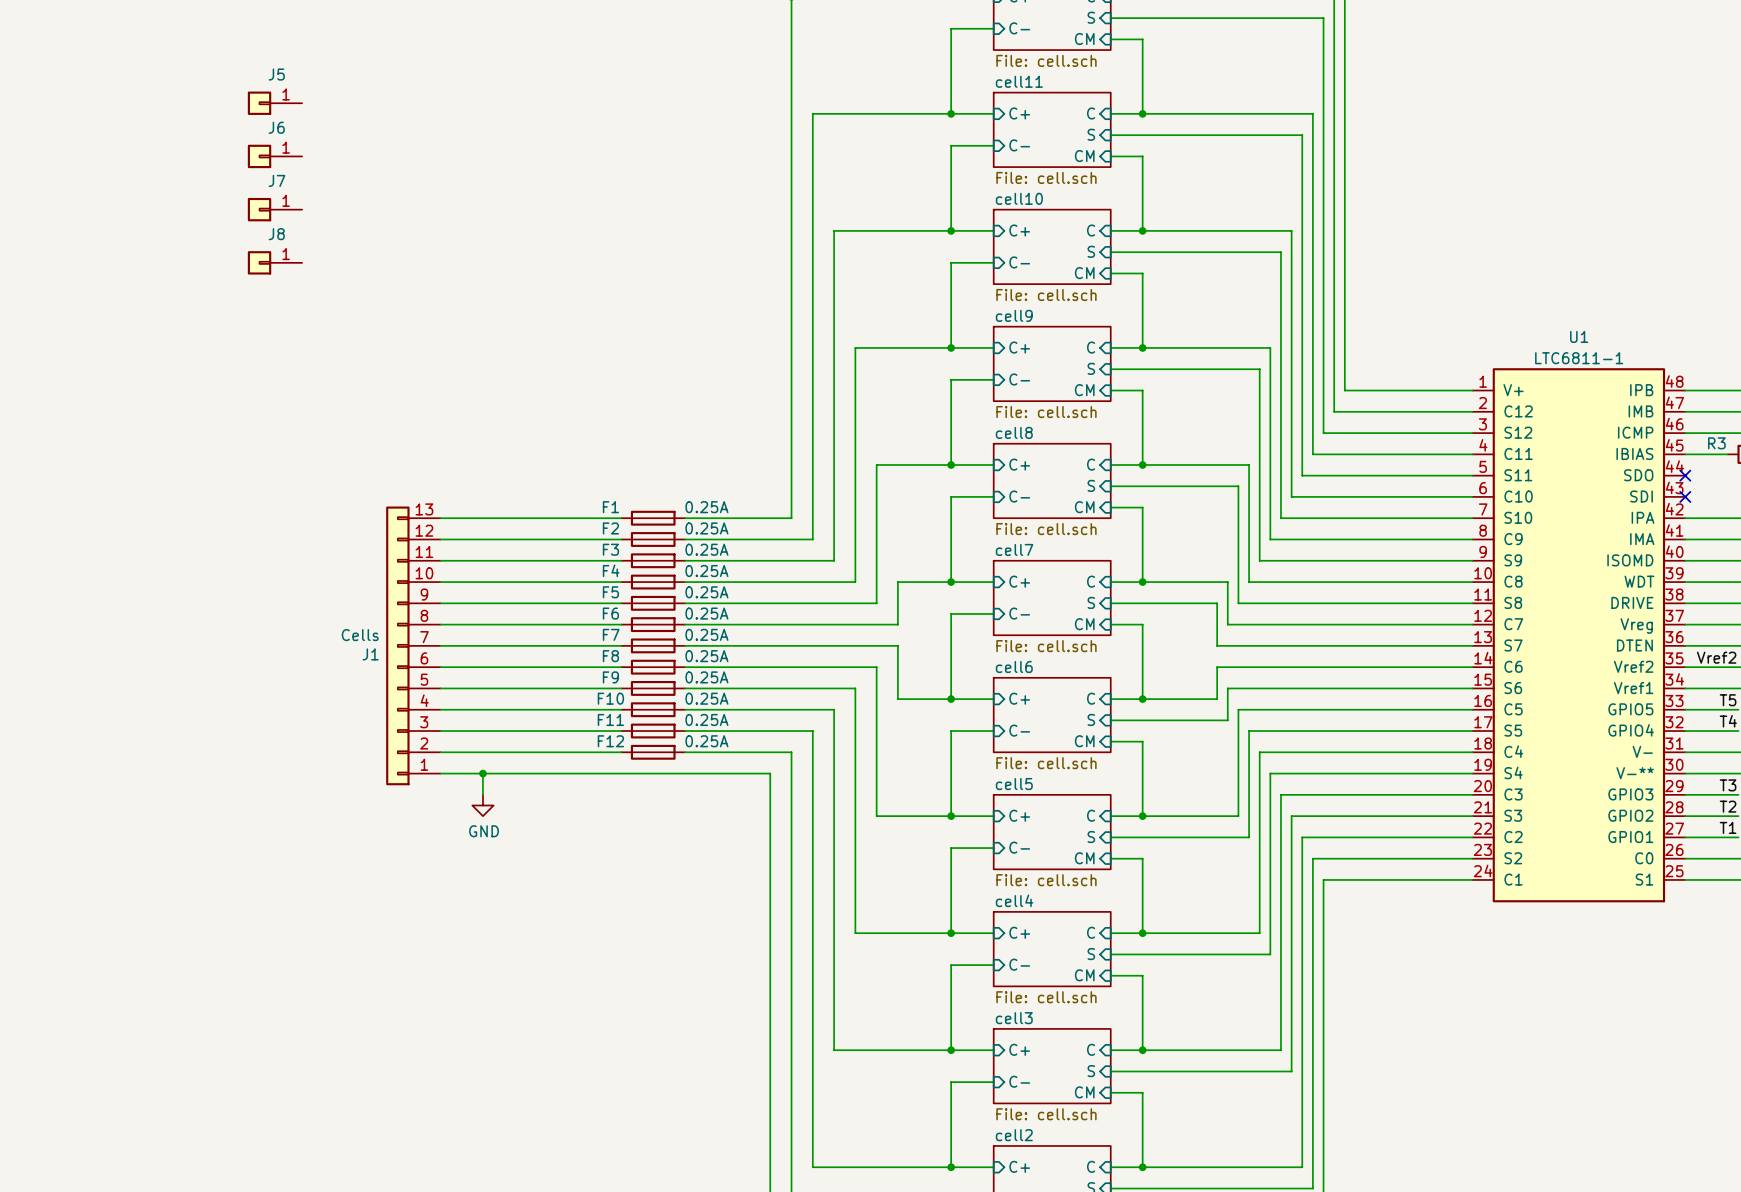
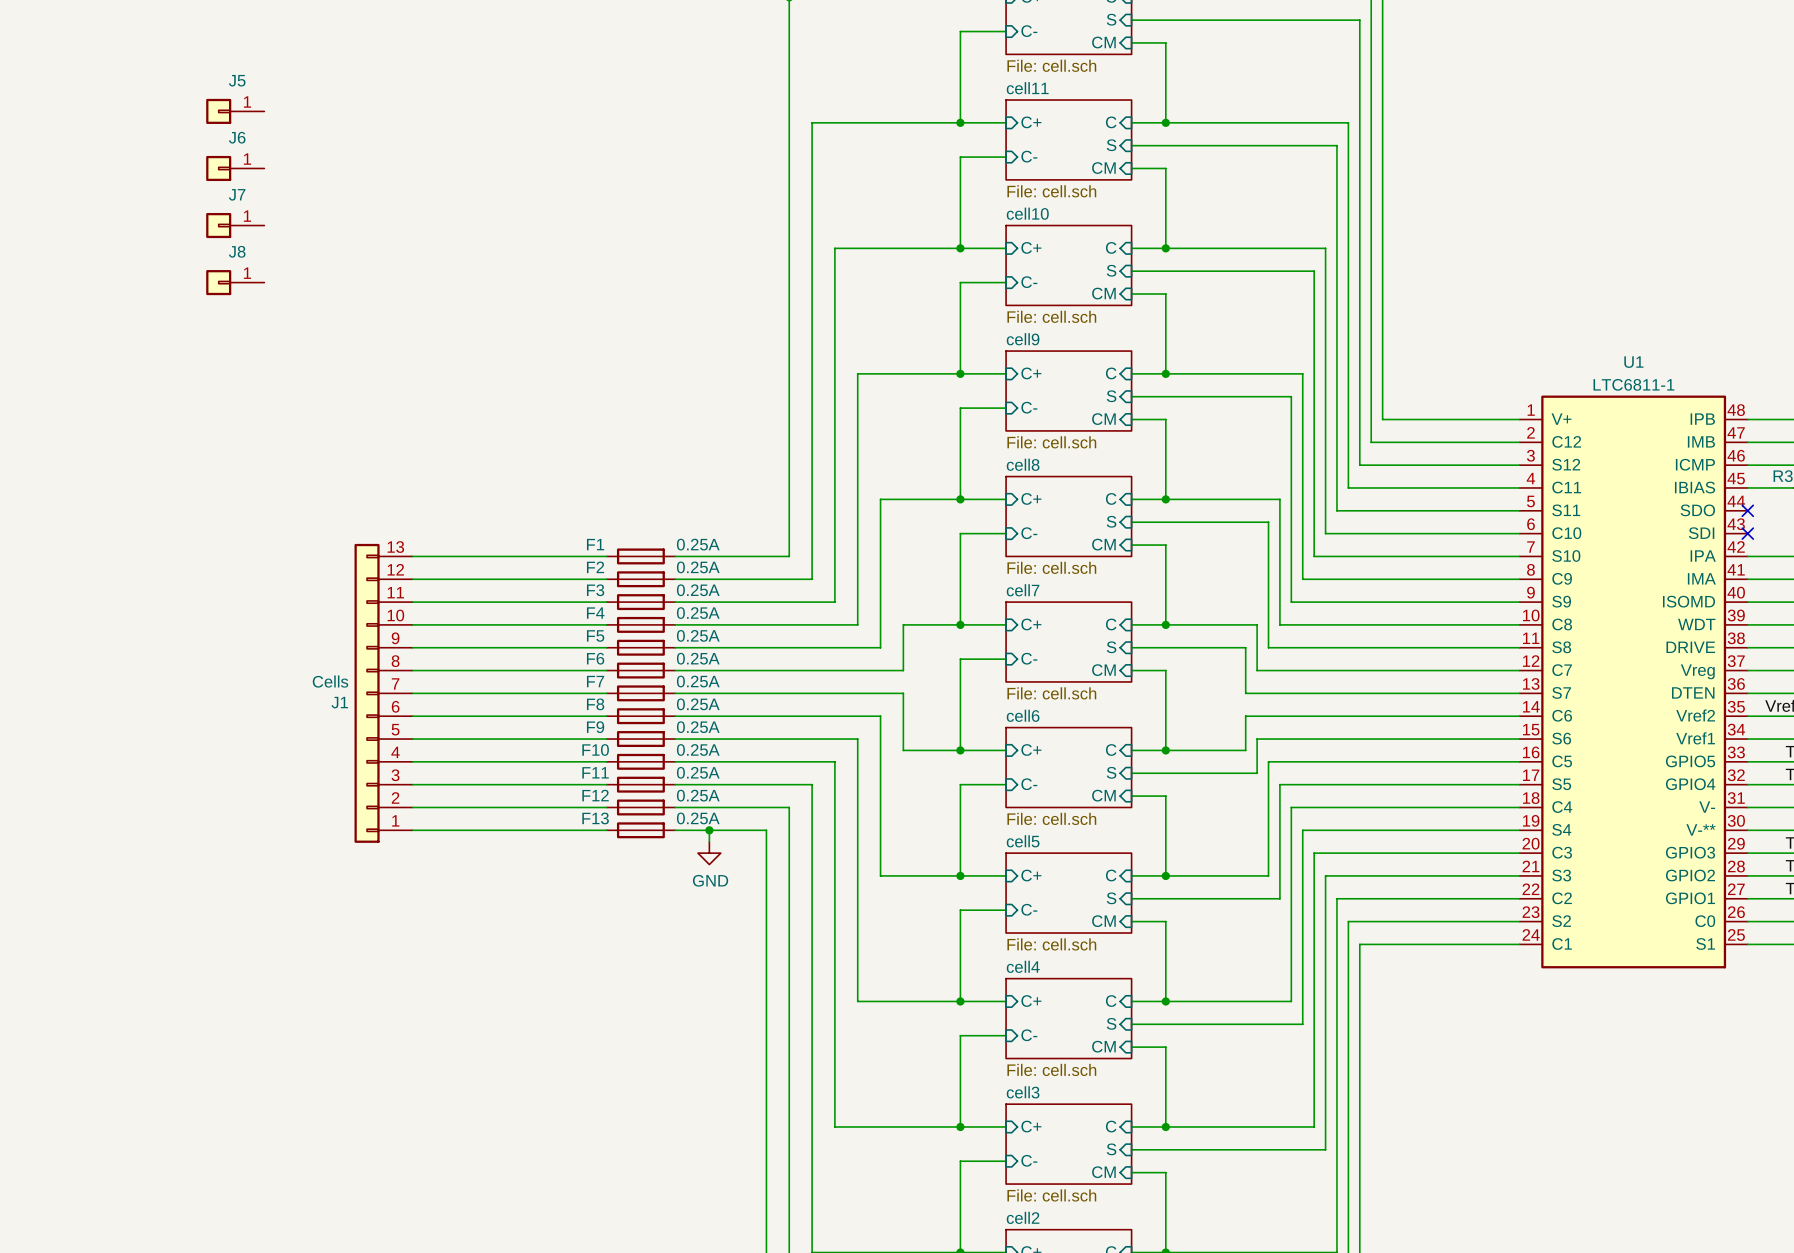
wire: (482, 773) (482, 794) -> none
junction: (482, 773) -> none
F13: none -> 0.25A (640, 830)
wire: none -> (709, 830) (709, 841)
junction: none -> (709, 830)
power symbol: none -> GND (709, 853)
power symbol: GND (482, 805) -> none

